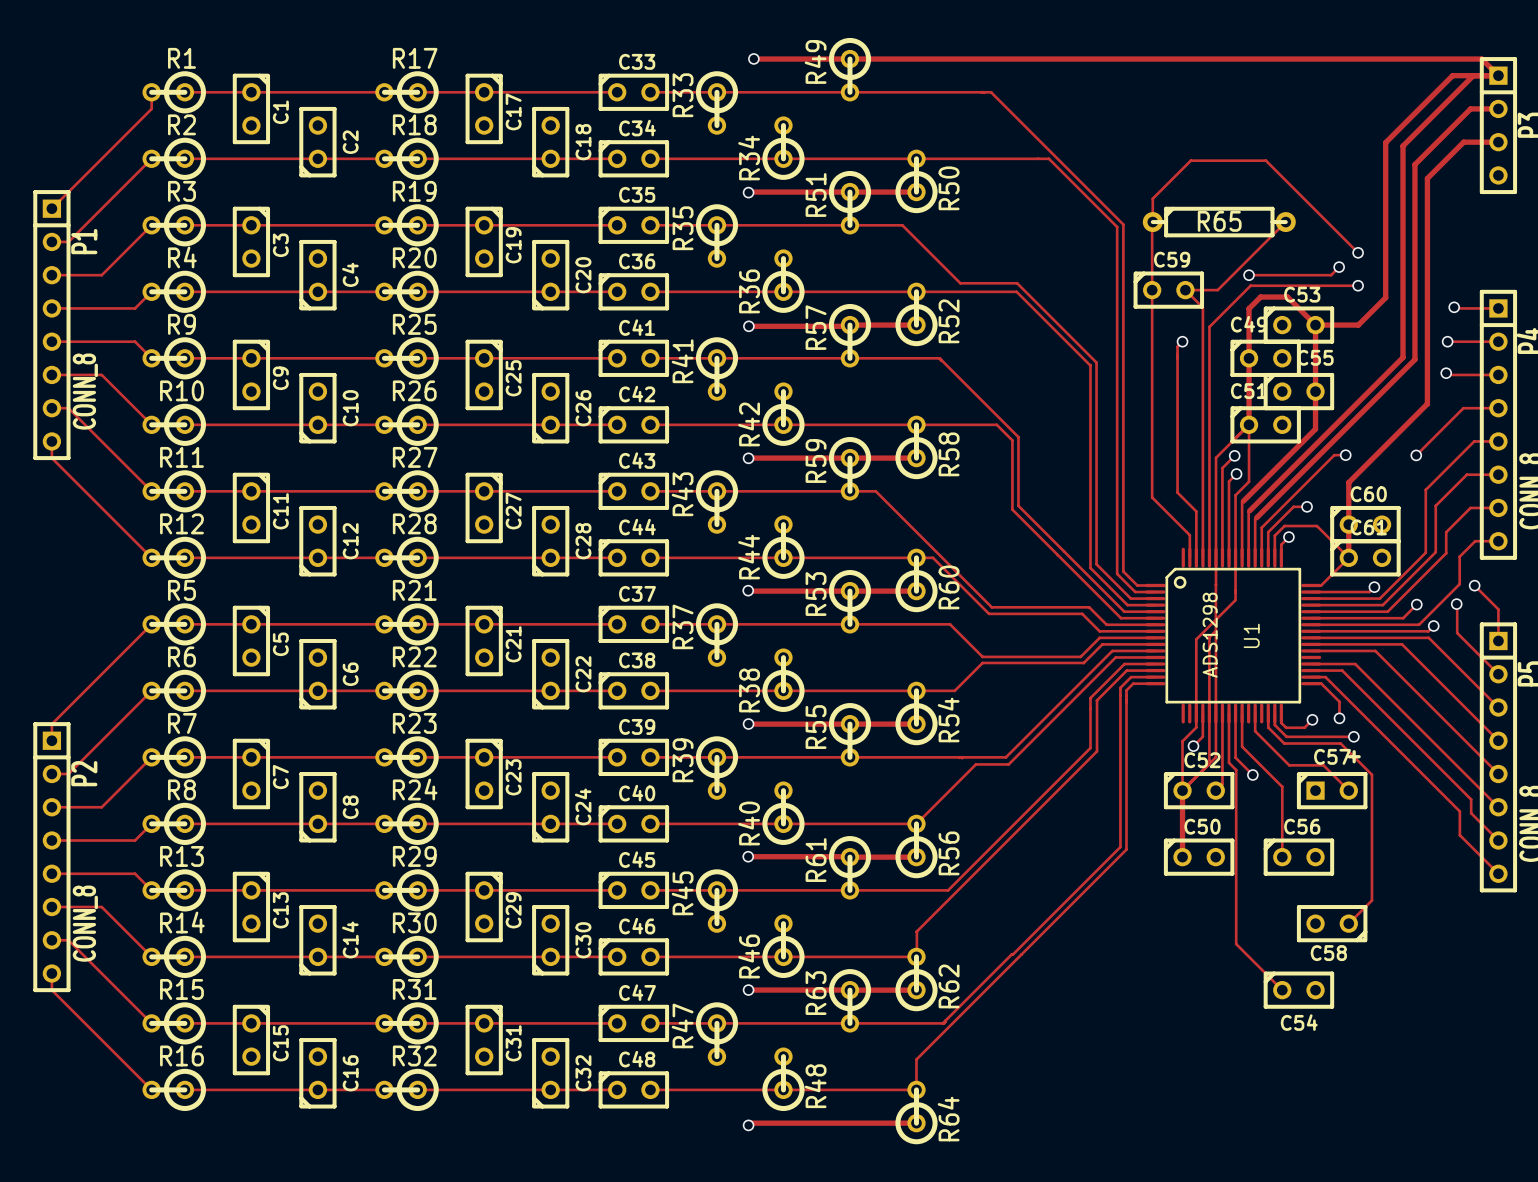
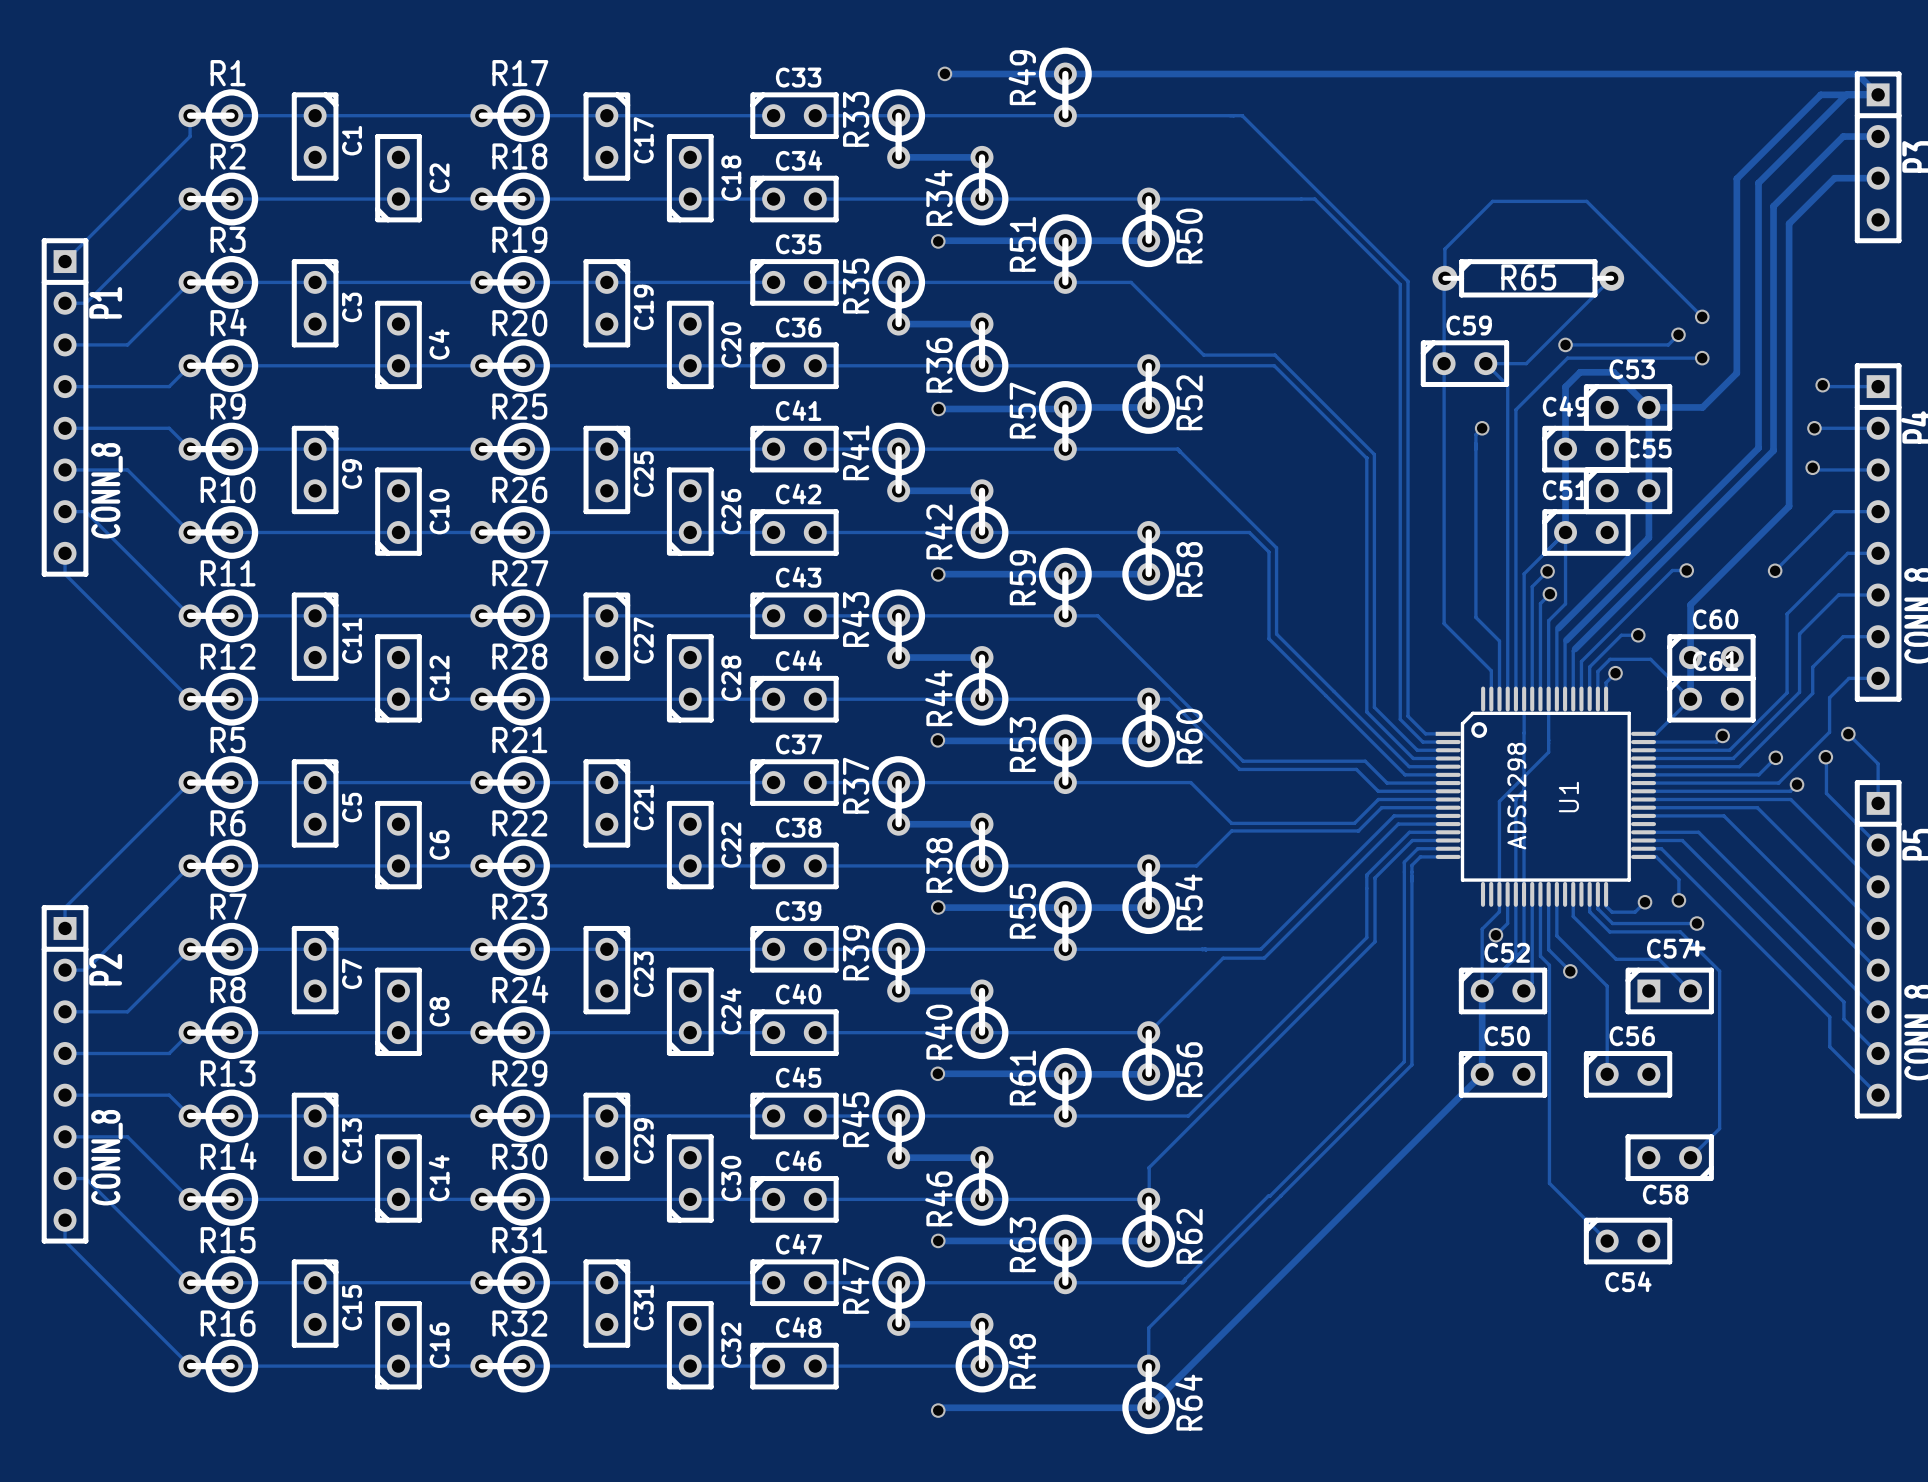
track: none -> (898, 157) (982, 157)
track: none -> (898, 324) (982, 324)
track: none -> (898, 490) (982, 490)
track: none -> (898, 657) (982, 657)
track: none -> (898, 824) (982, 824)
track: none -> (898, 990) (982, 990)
track: none -> (1482, 1074) (1148, 1407)
track: none -> (898, 1157) (982, 1157)
track: none -> (898, 1324) (982, 1324)

